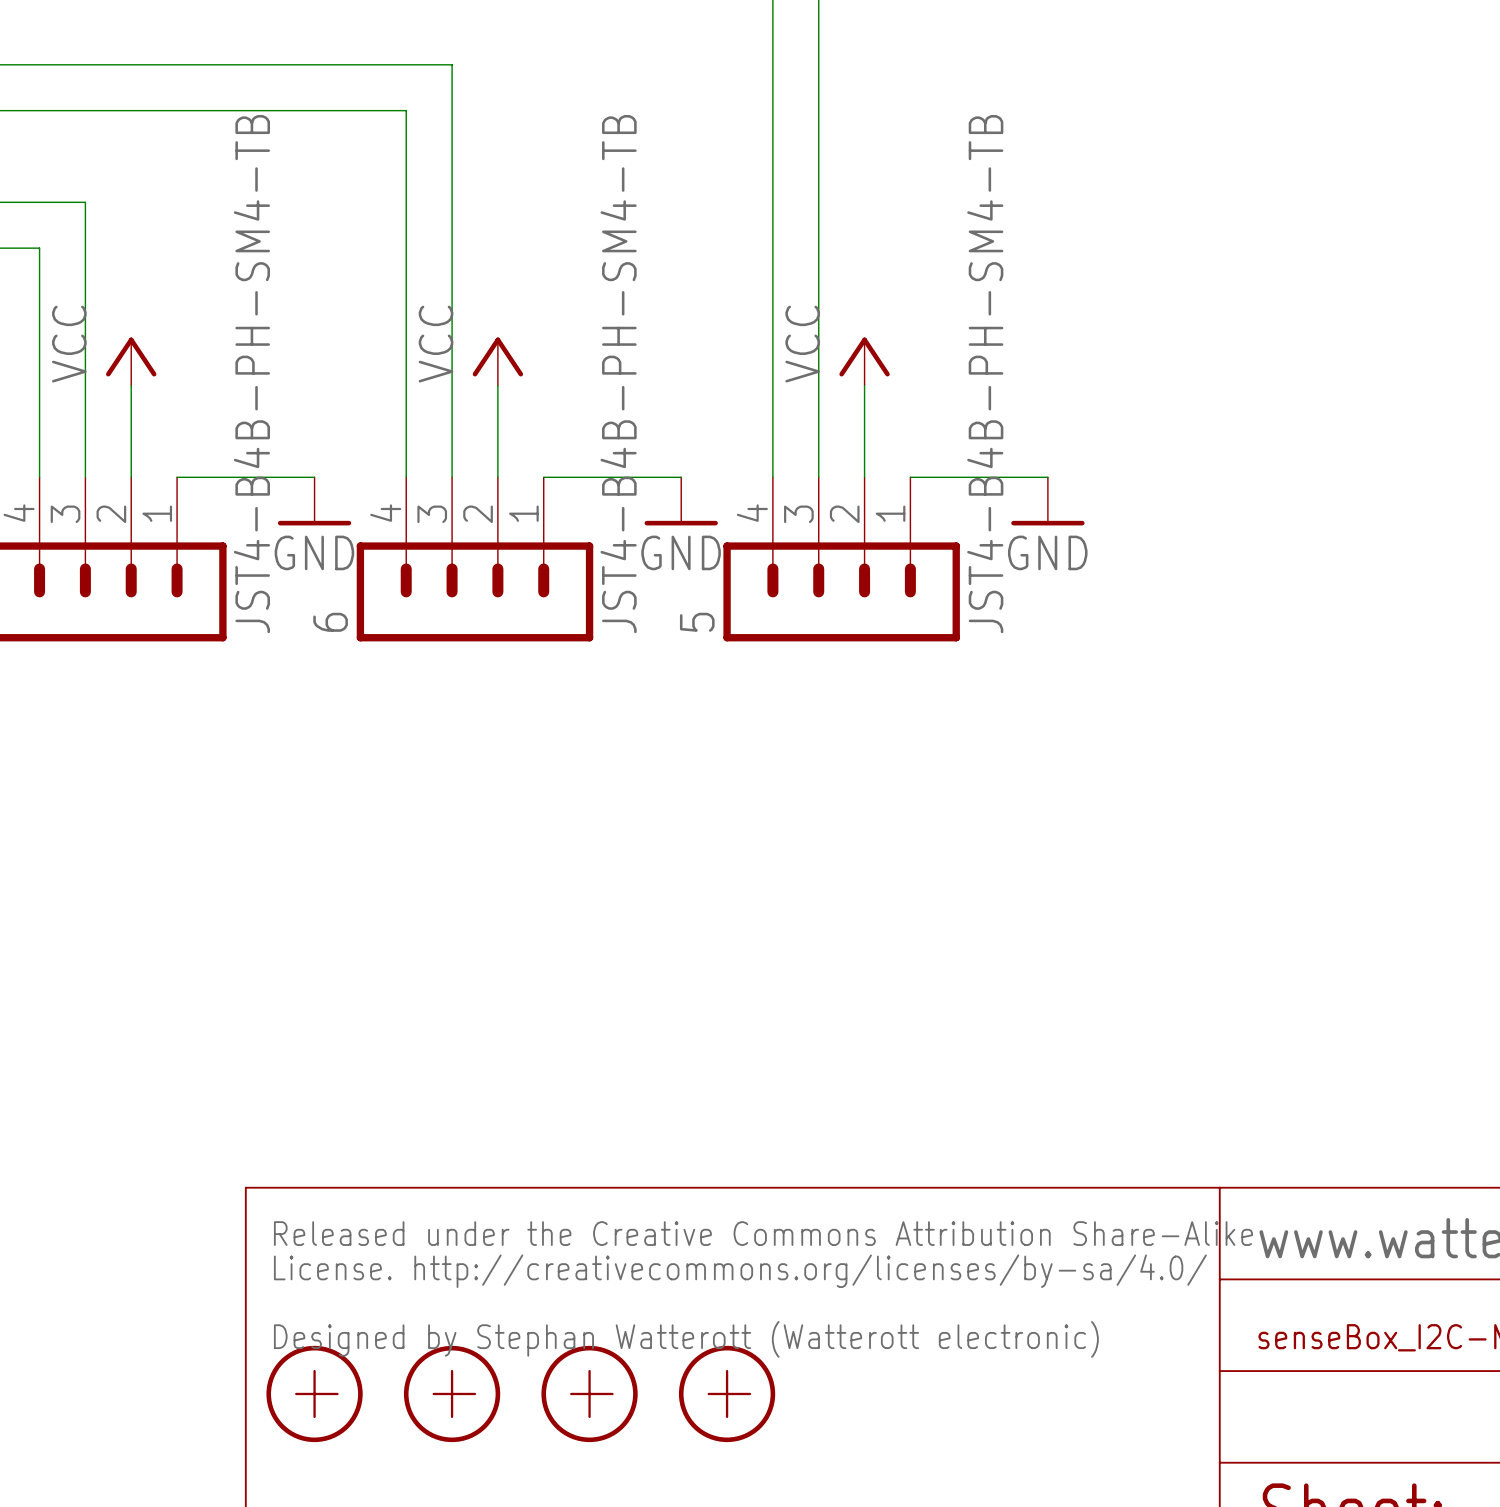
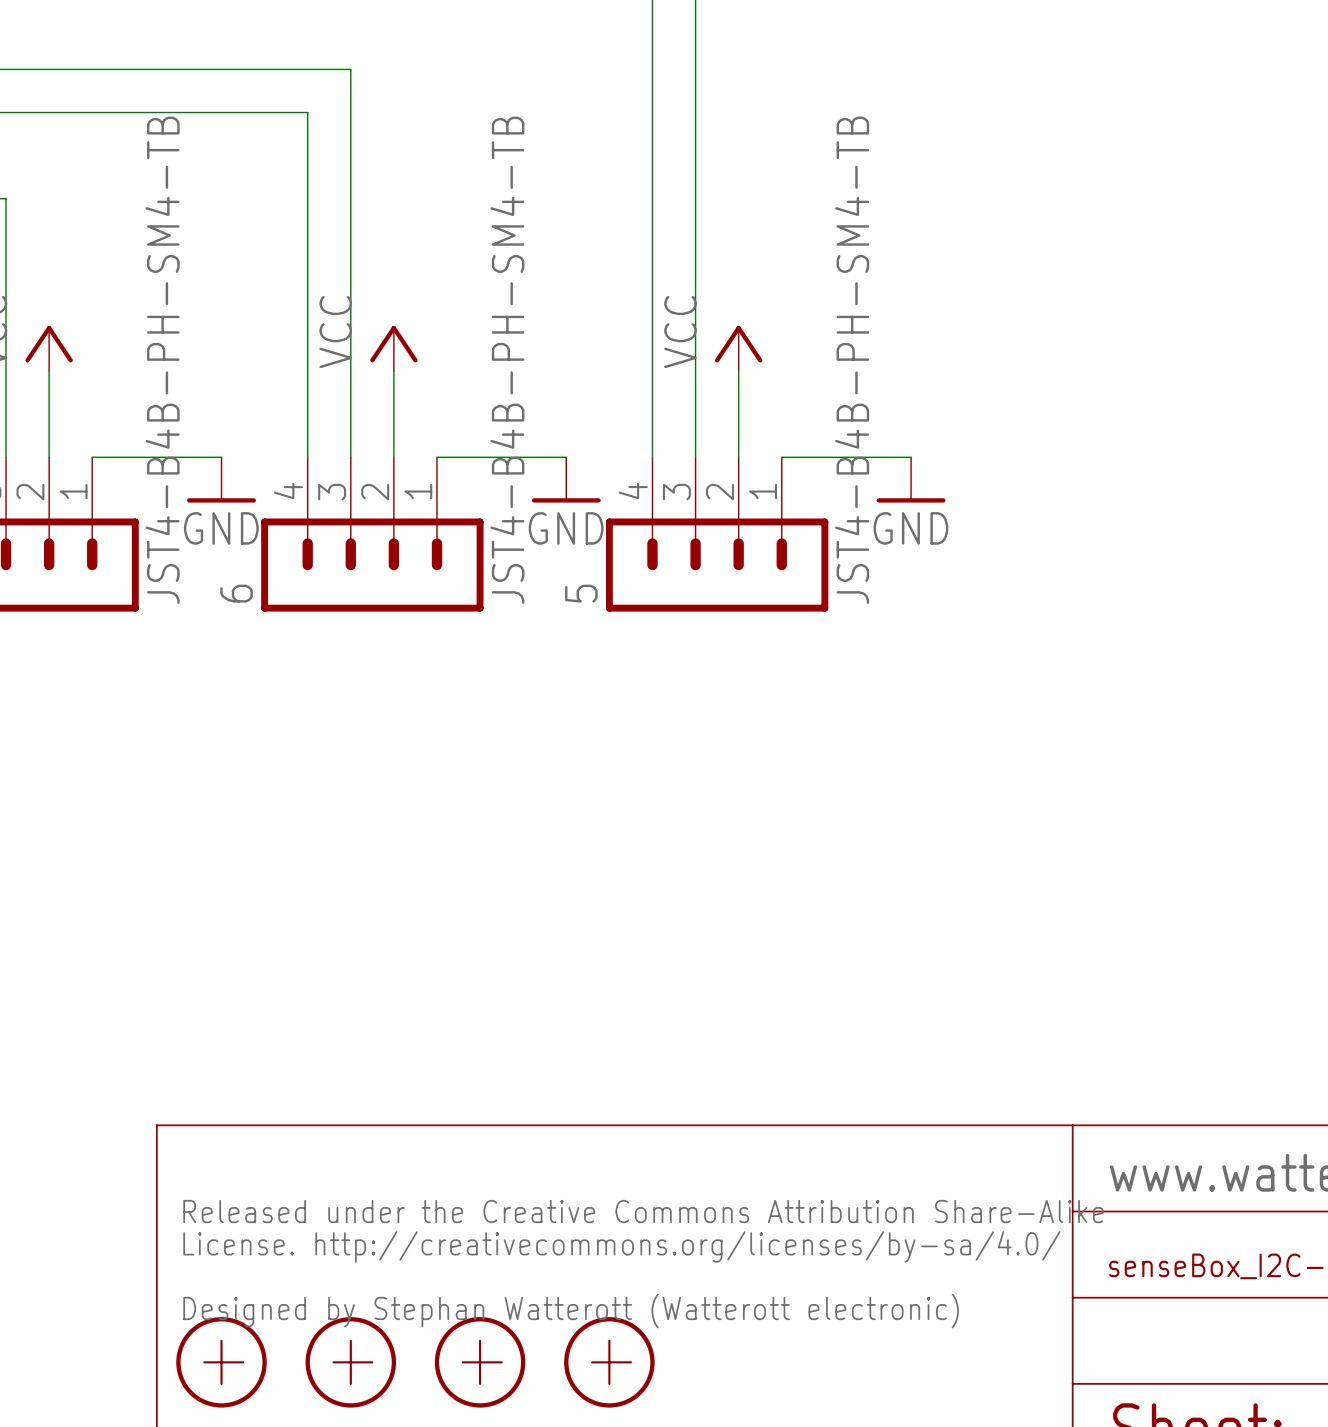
text position: Released under the Creative Commons Attribution Share-Alike (763, 1233) -> Released under the Creative Commons Attribution Share-Alike (643, 1211)
text position: License. http://creativecommons.org/licenses/by-sa/4.0/ (740, 1271) -> License. http://creativecommons.org/licenses/by-sa/4.0/ (621, 1246)
text position: Designed by Stephan Watterott (Watterott electronic) (686, 1339) -> Designed by Stephan Watterott (Watterott electronic) (571, 1311)
part position: (314, 1393) -> (221, 1362)
part position: (452, 1393) -> (350, 1362)
part position: (589, 1393) -> (480, 1362)
part position: (727, 1393) -> (609, 1362)

